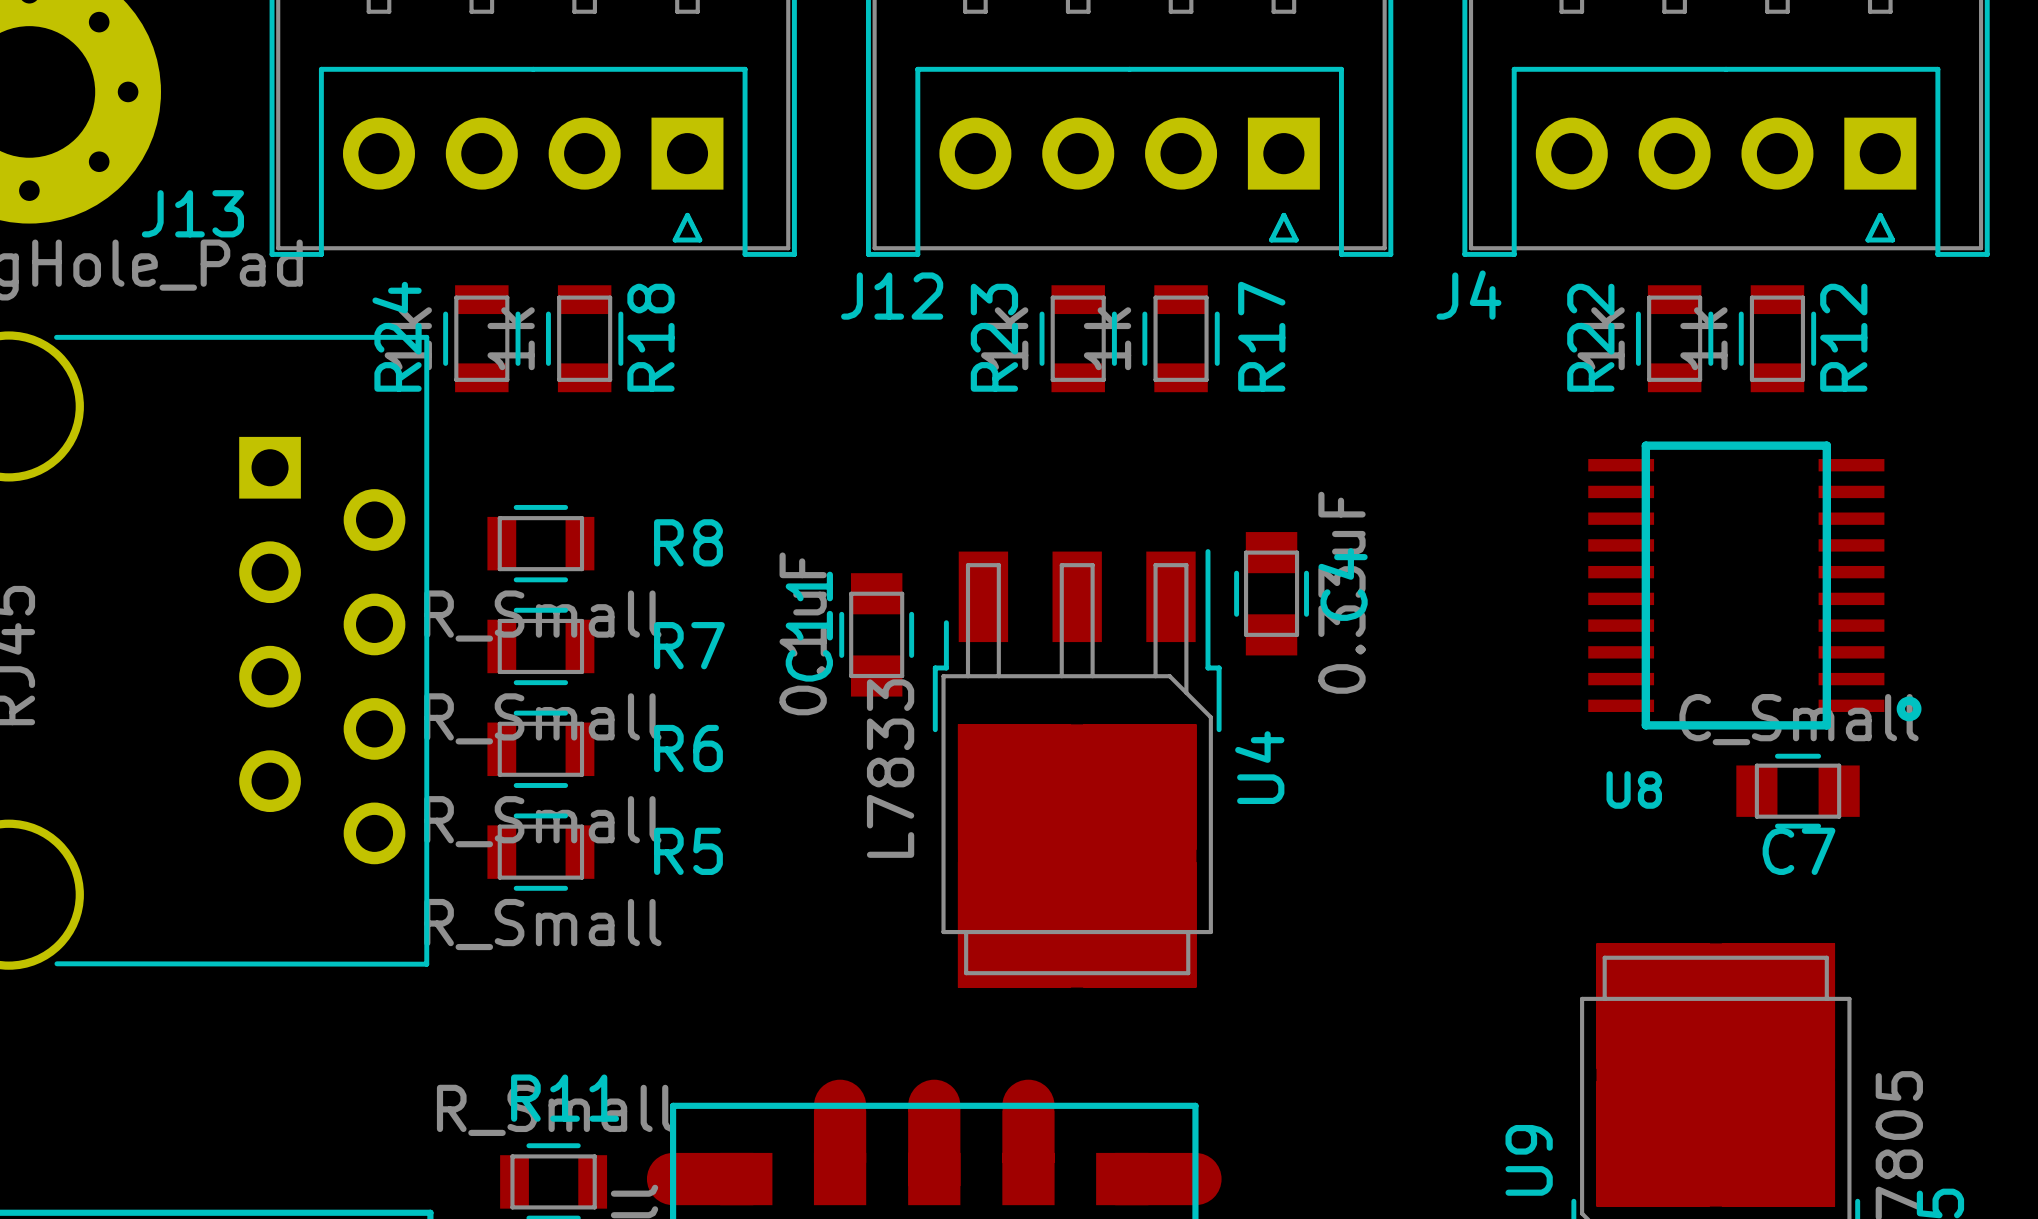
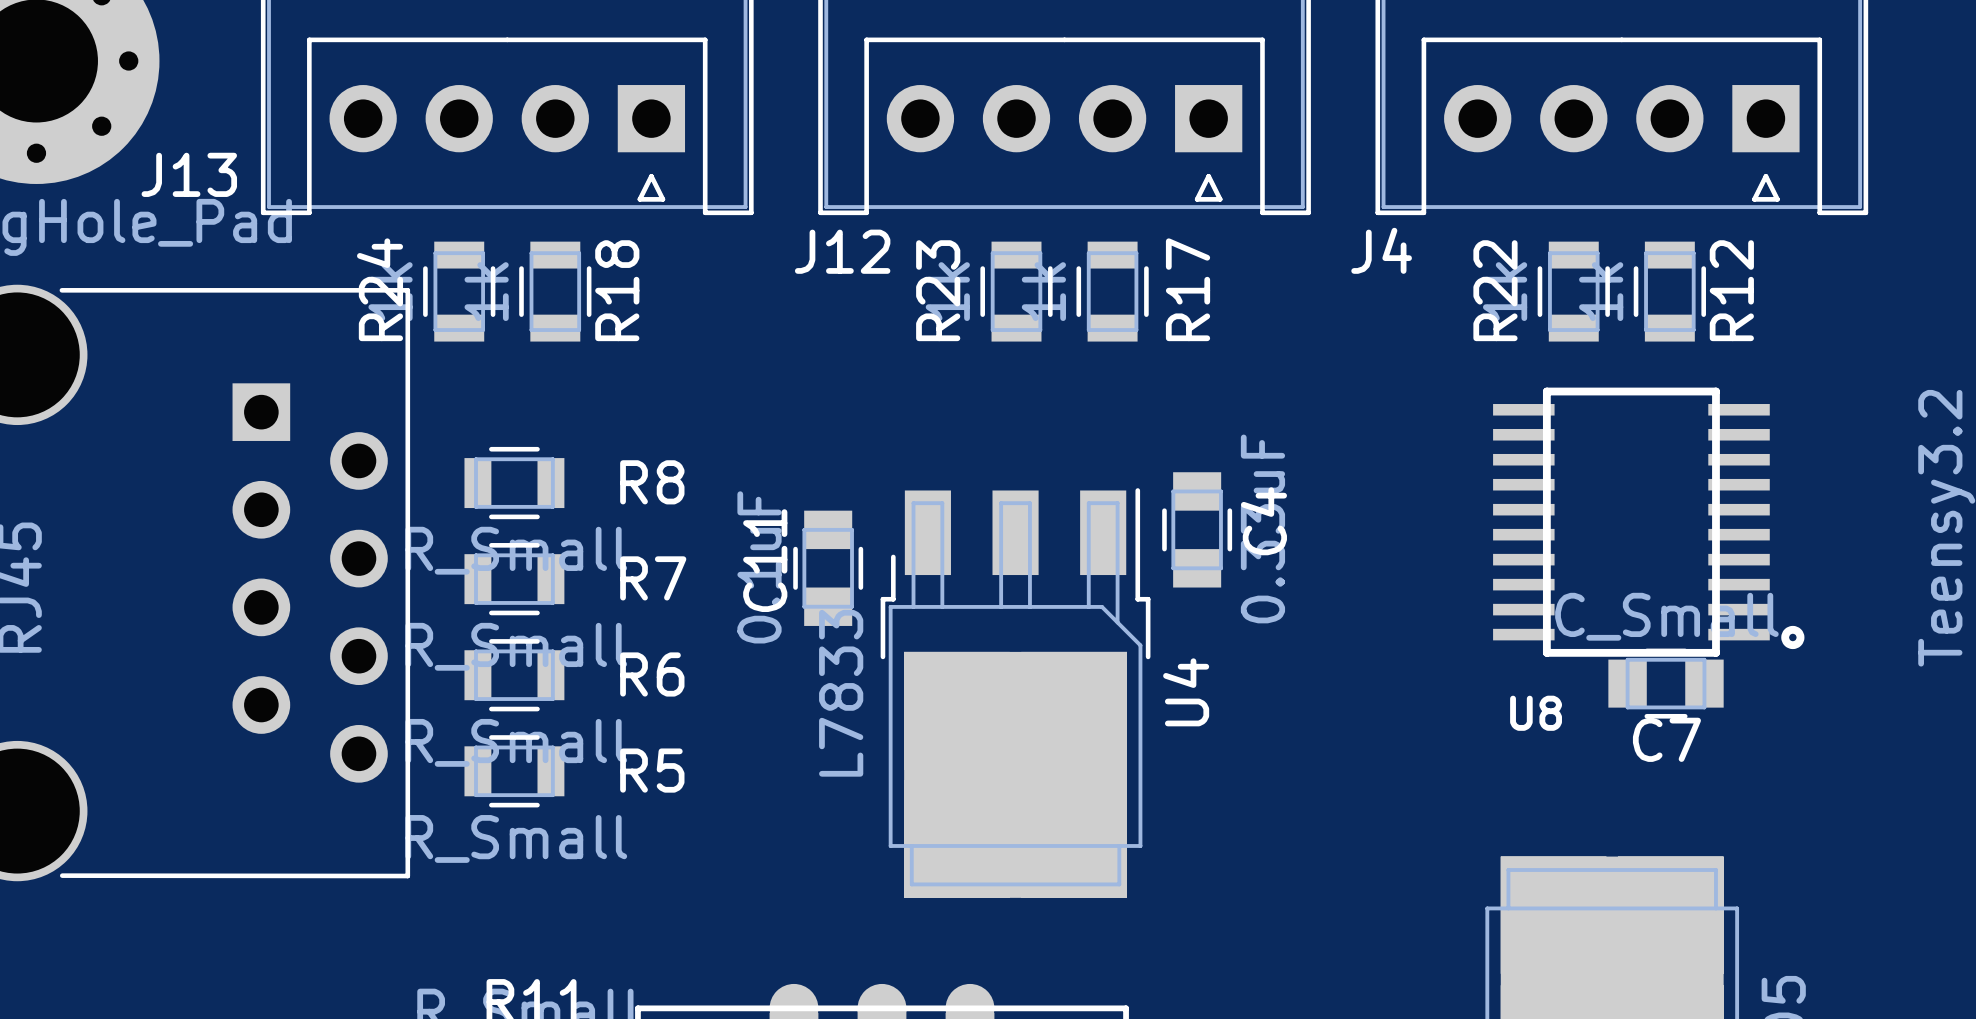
C7 position: (1798, 791) -> (1666, 683)

